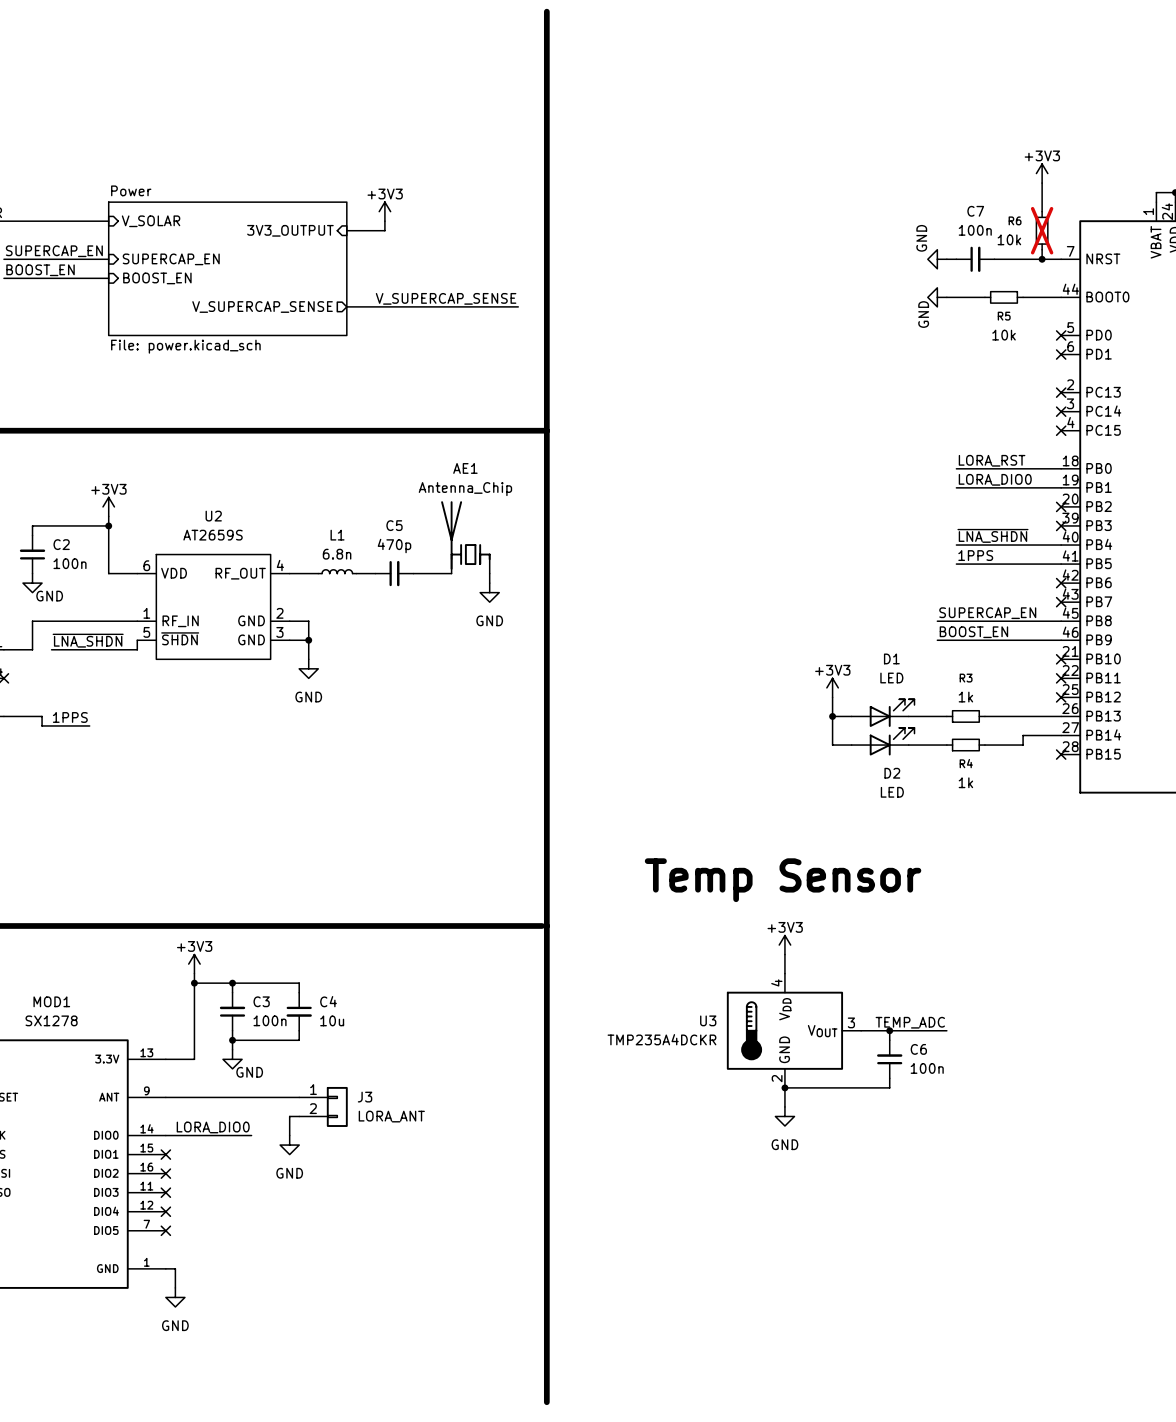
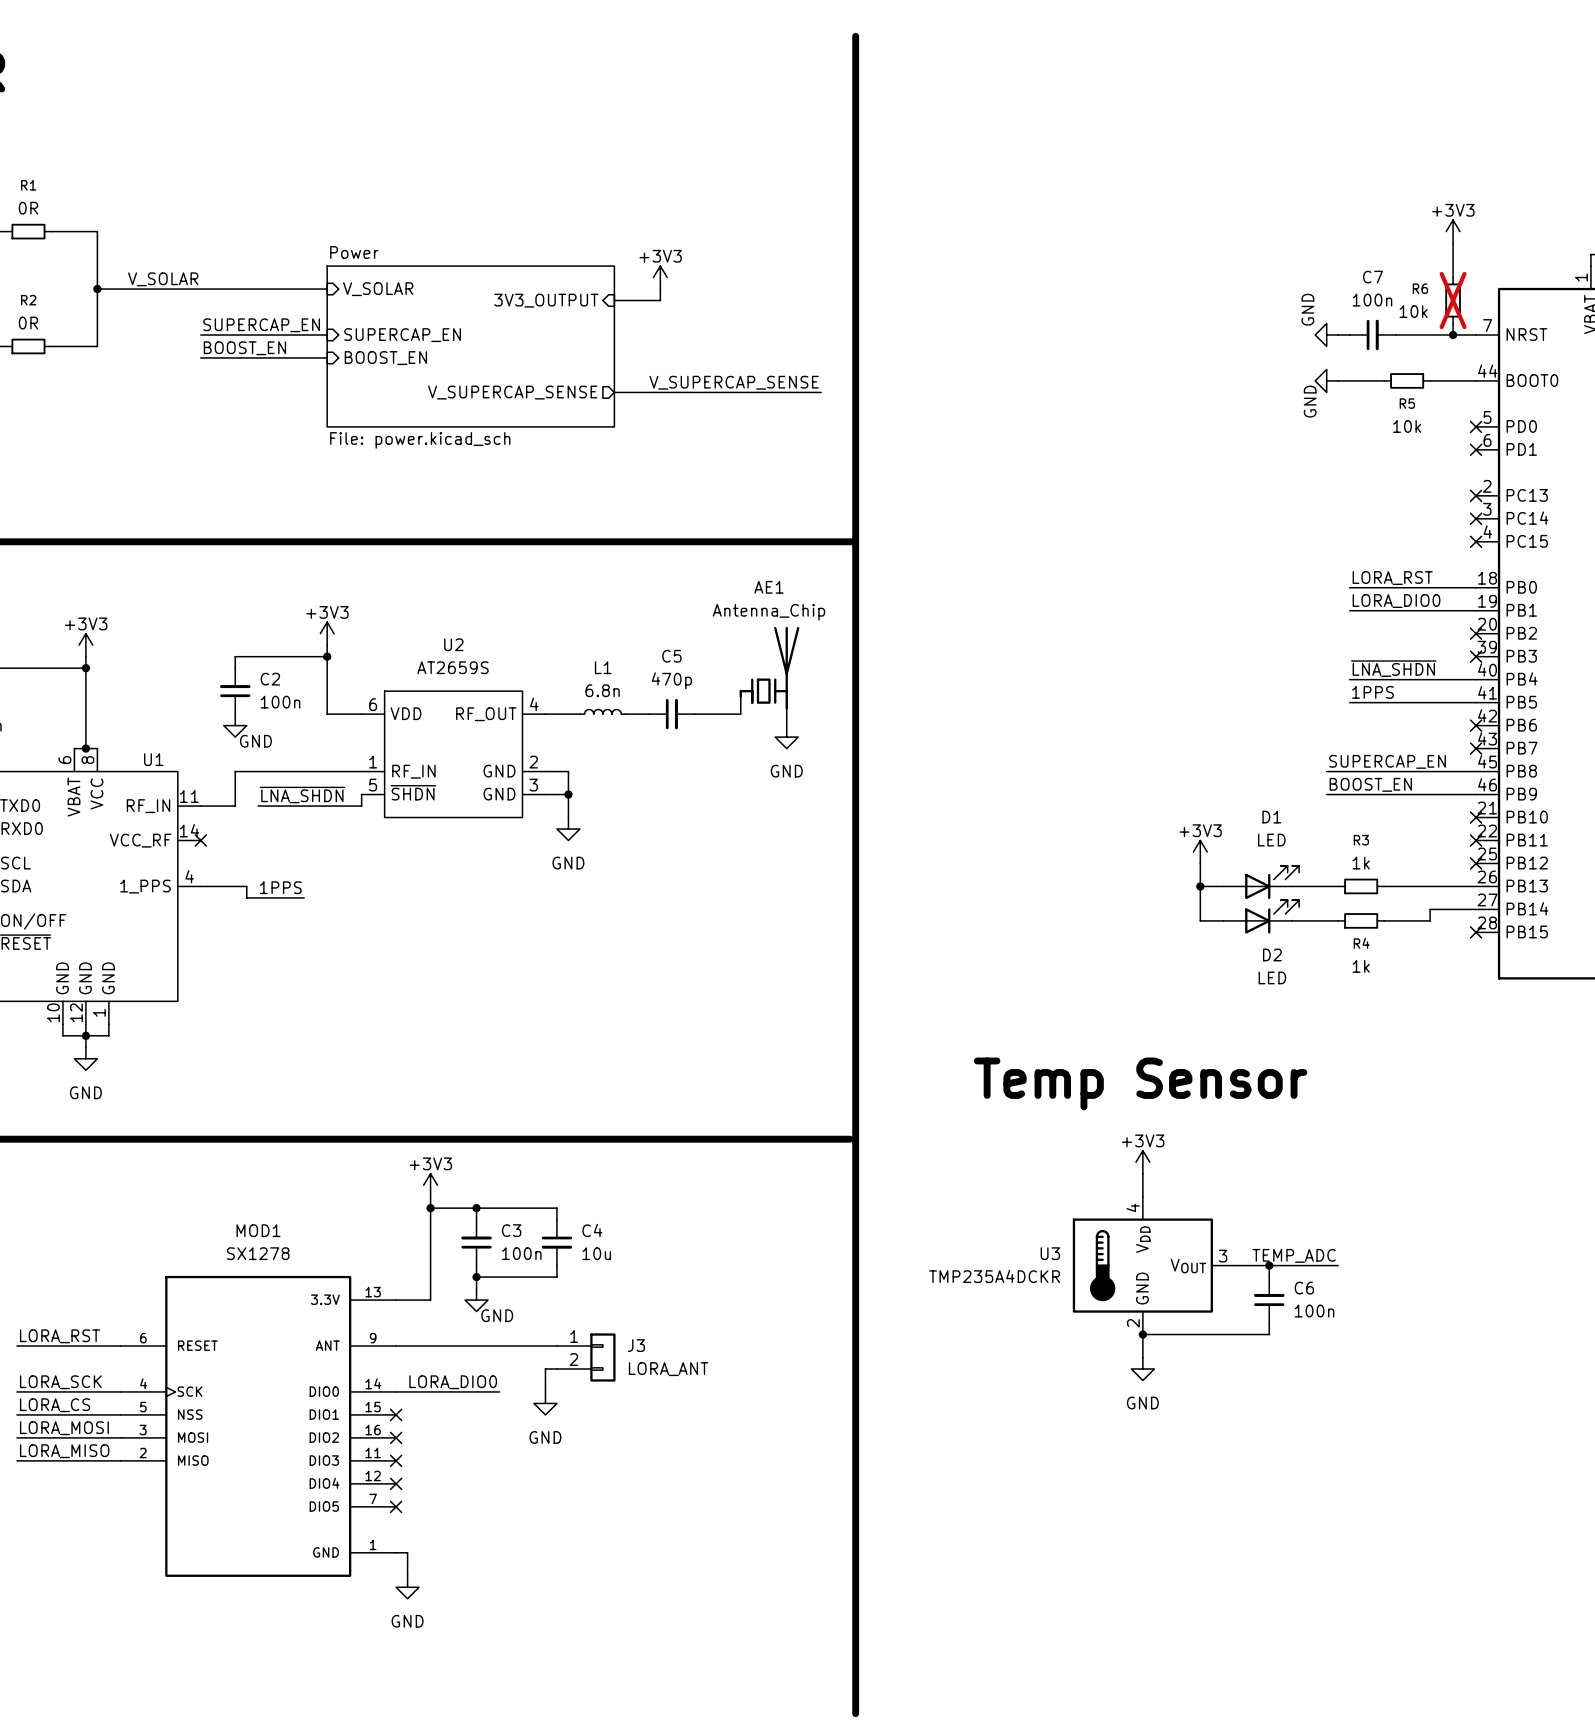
AE1 flip: as is (465, 535) -> left-right (769, 668)

